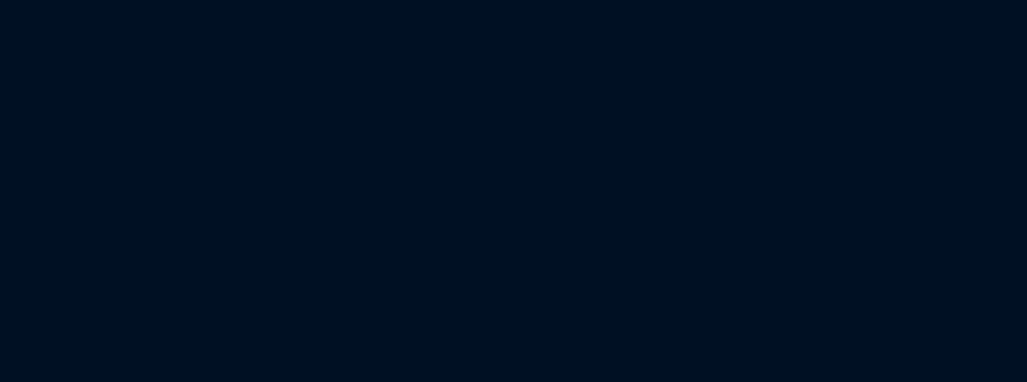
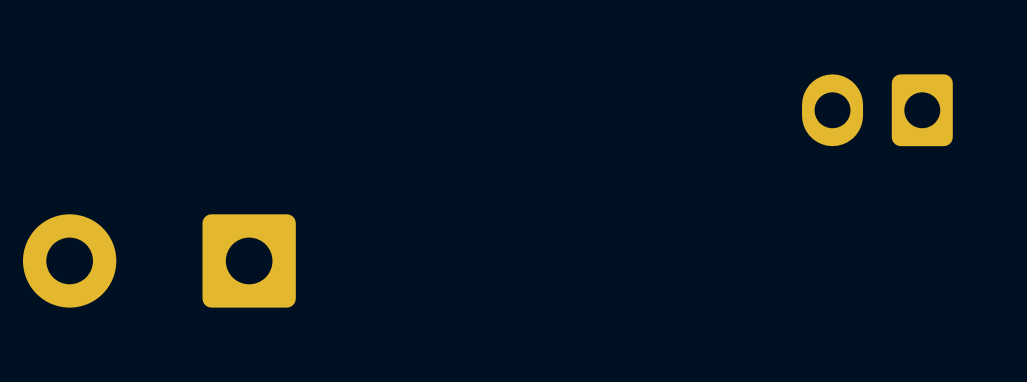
part: none -> (877, 110)
part: none -> (159, 260)

